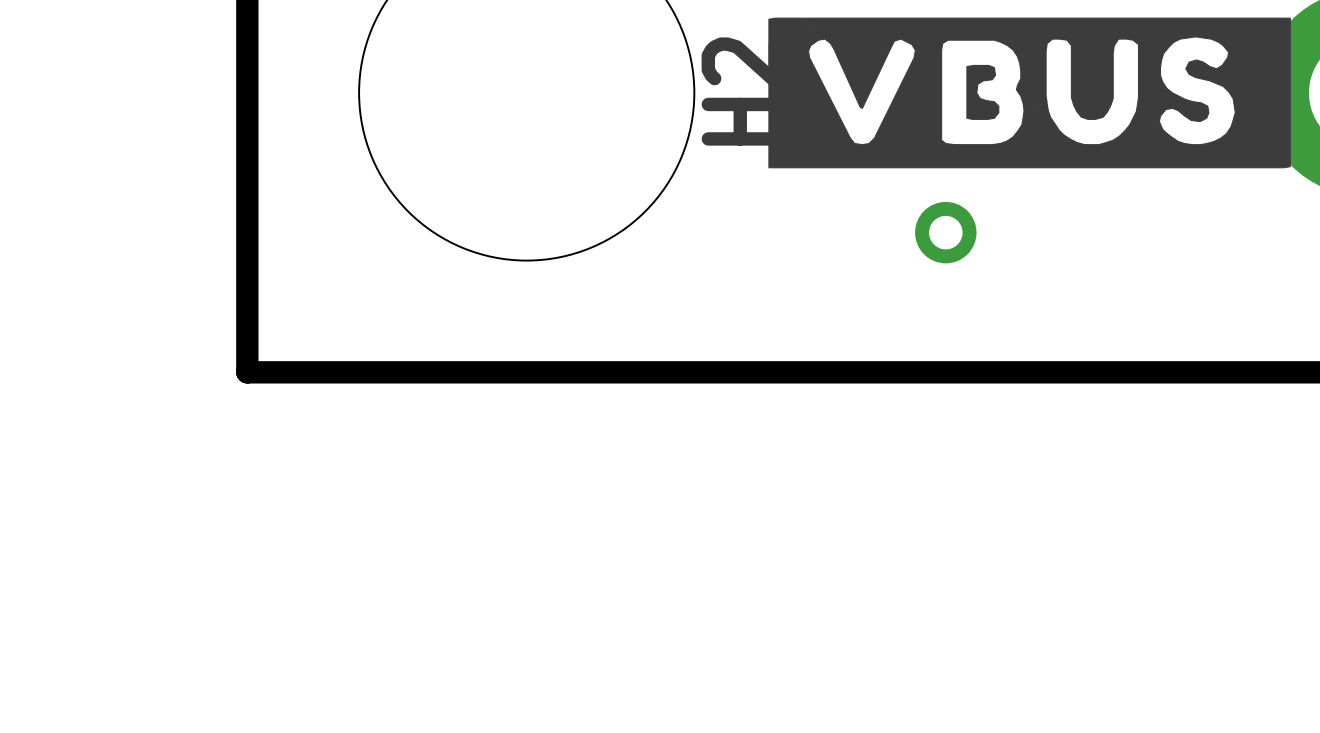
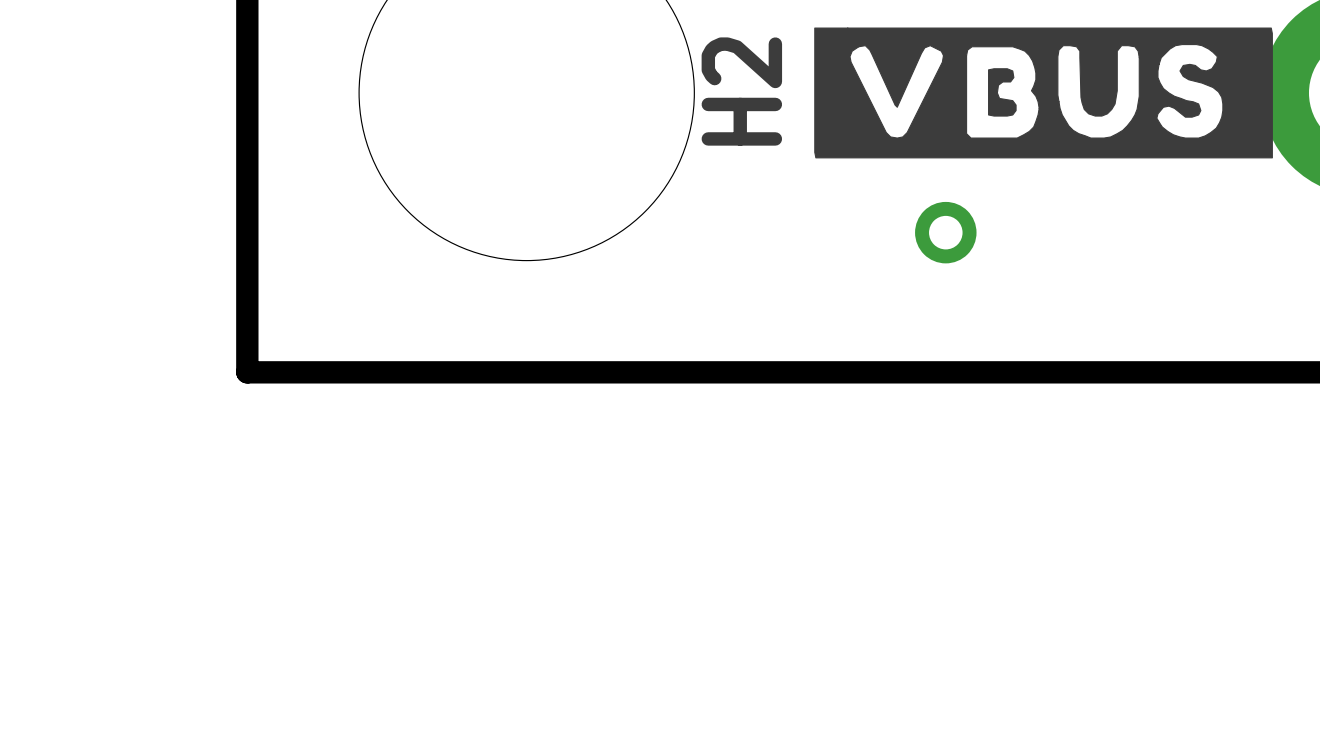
drawing shape: [768, 17, 1291, 169] -> [814, 27, 1273, 159]

